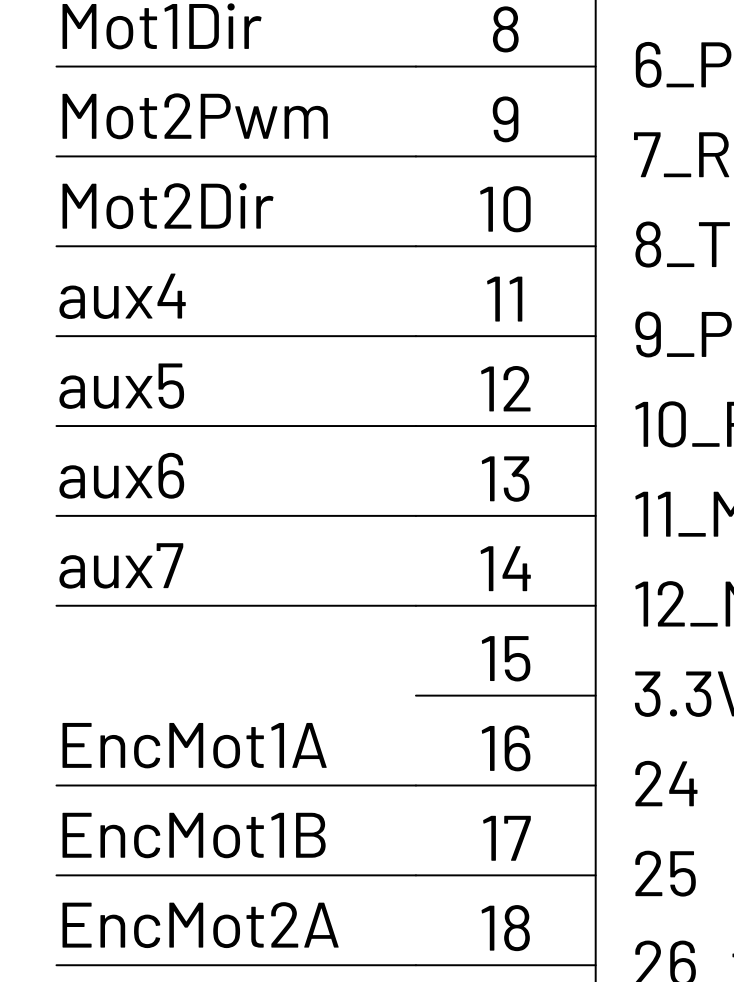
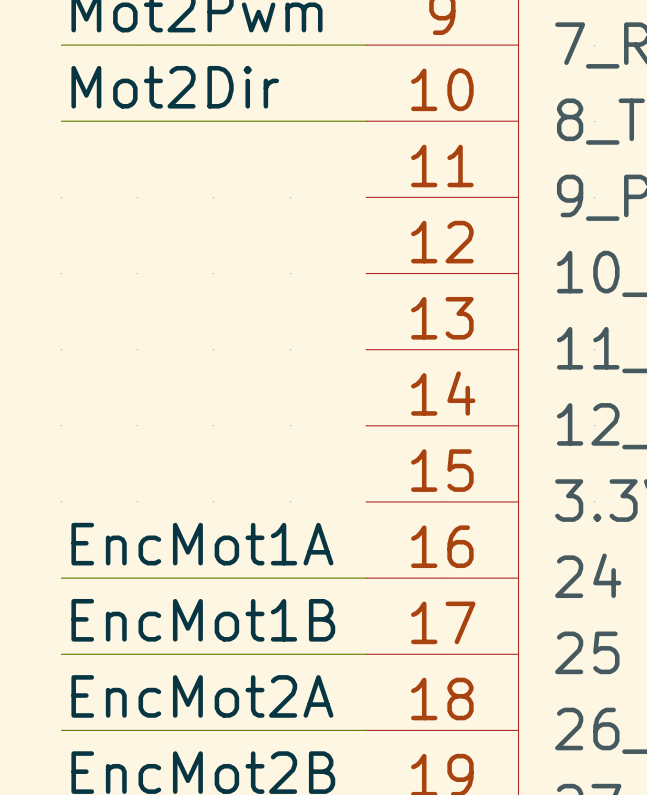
label: aux4 (122, 296) -> none
wire: (56, 336) (415, 336) -> none
label: aux5 (121, 386) -> none
wire: (56, 426) (415, 426) -> none
label: aux6 (121, 475) -> none
wire: (56, 515) (415, 515) -> none
label: aux7 (121, 565) -> none
wire: (56, 605) (415, 605) -> none

